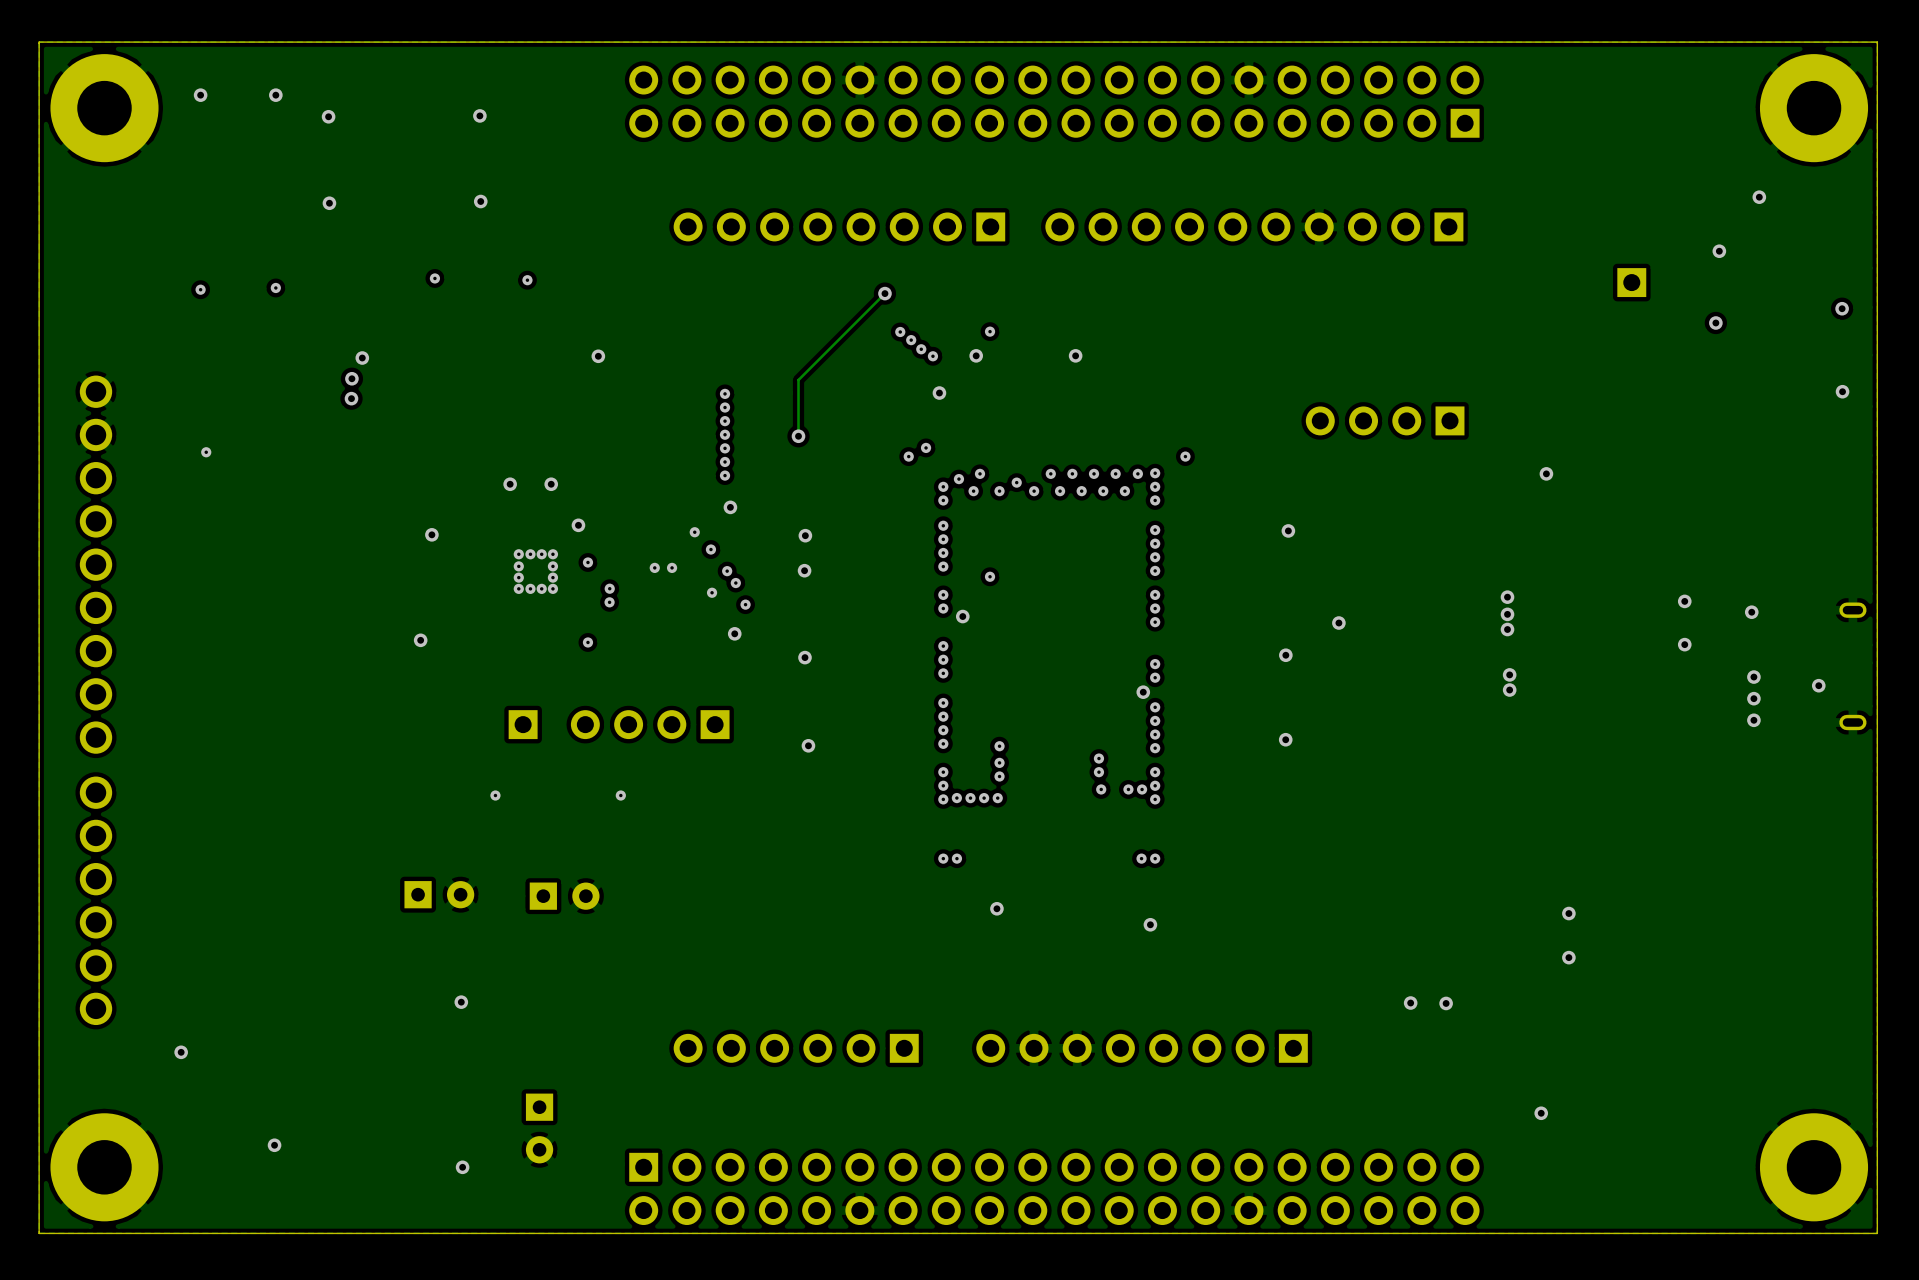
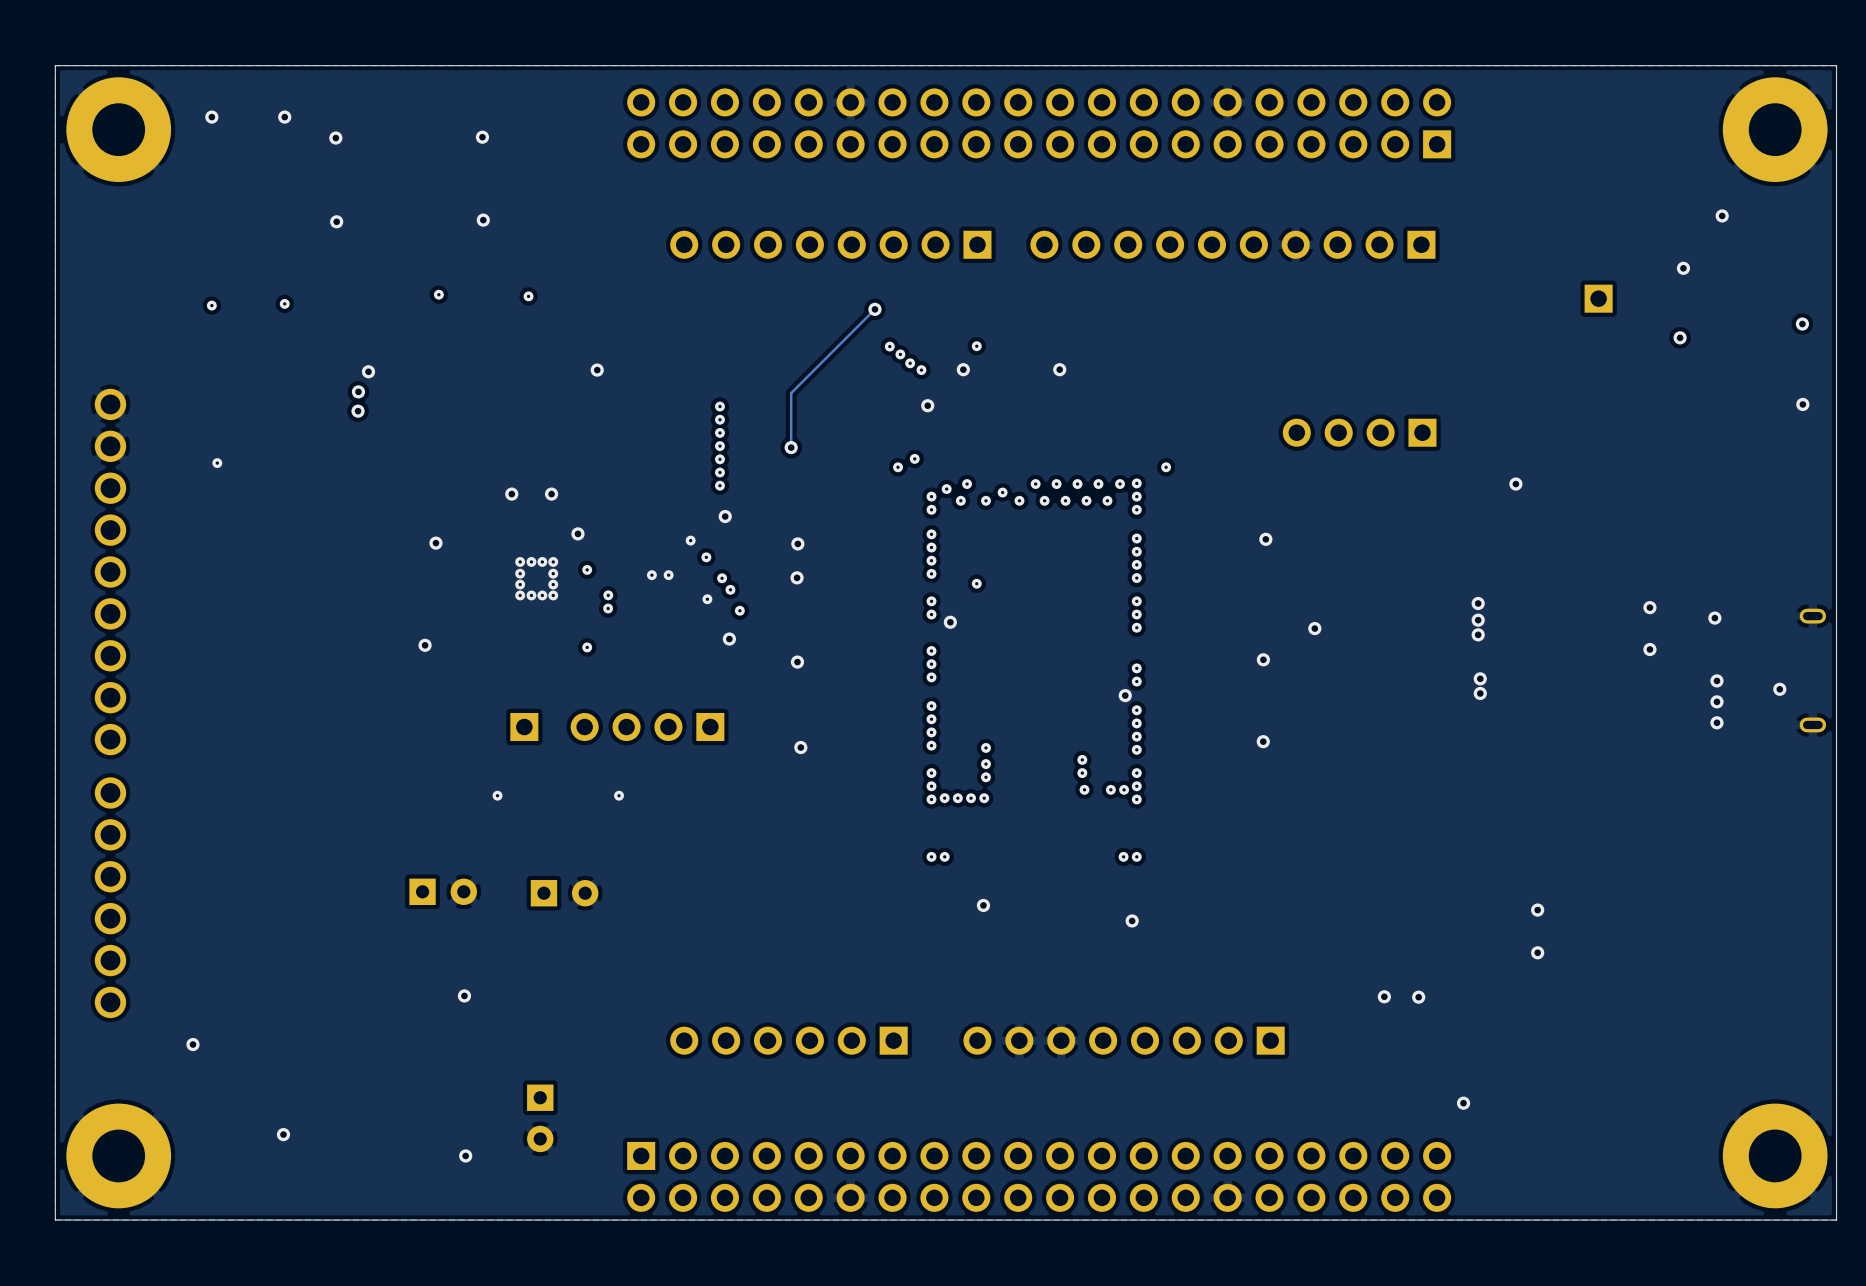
via position: (1541, 1113) -> (1463, 1103)

